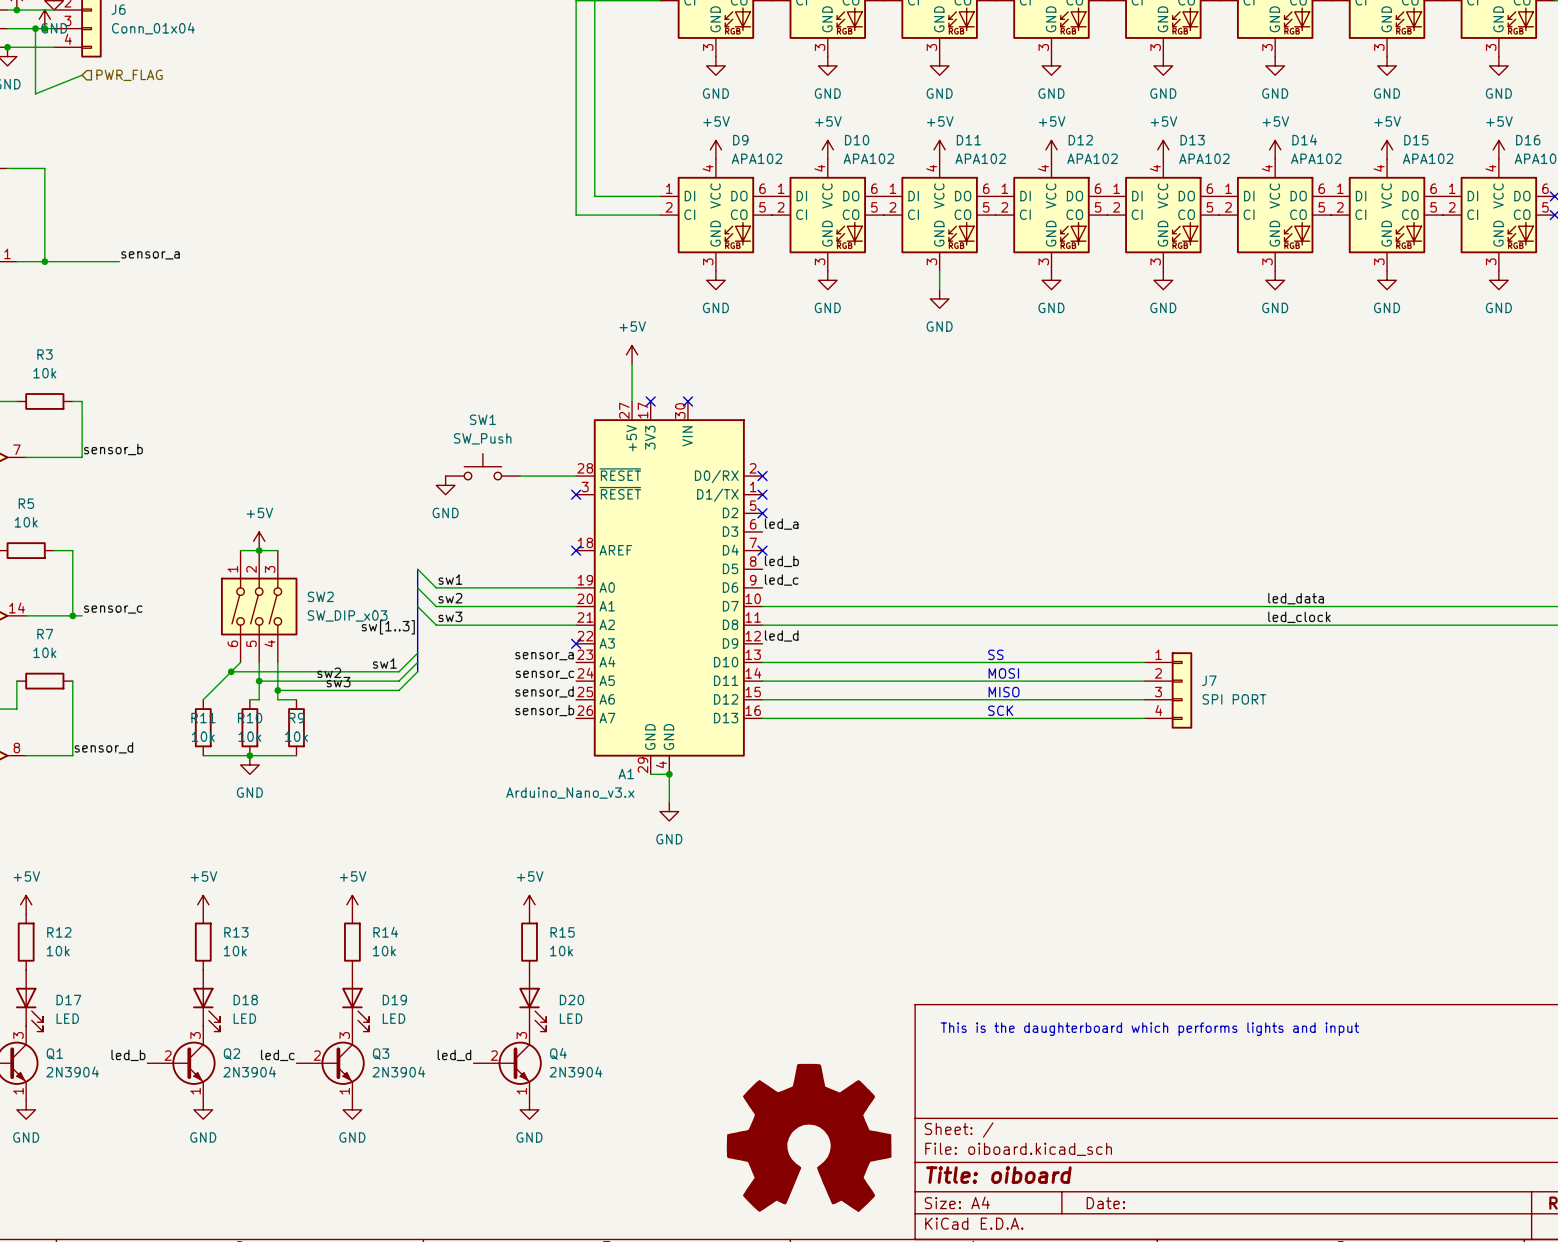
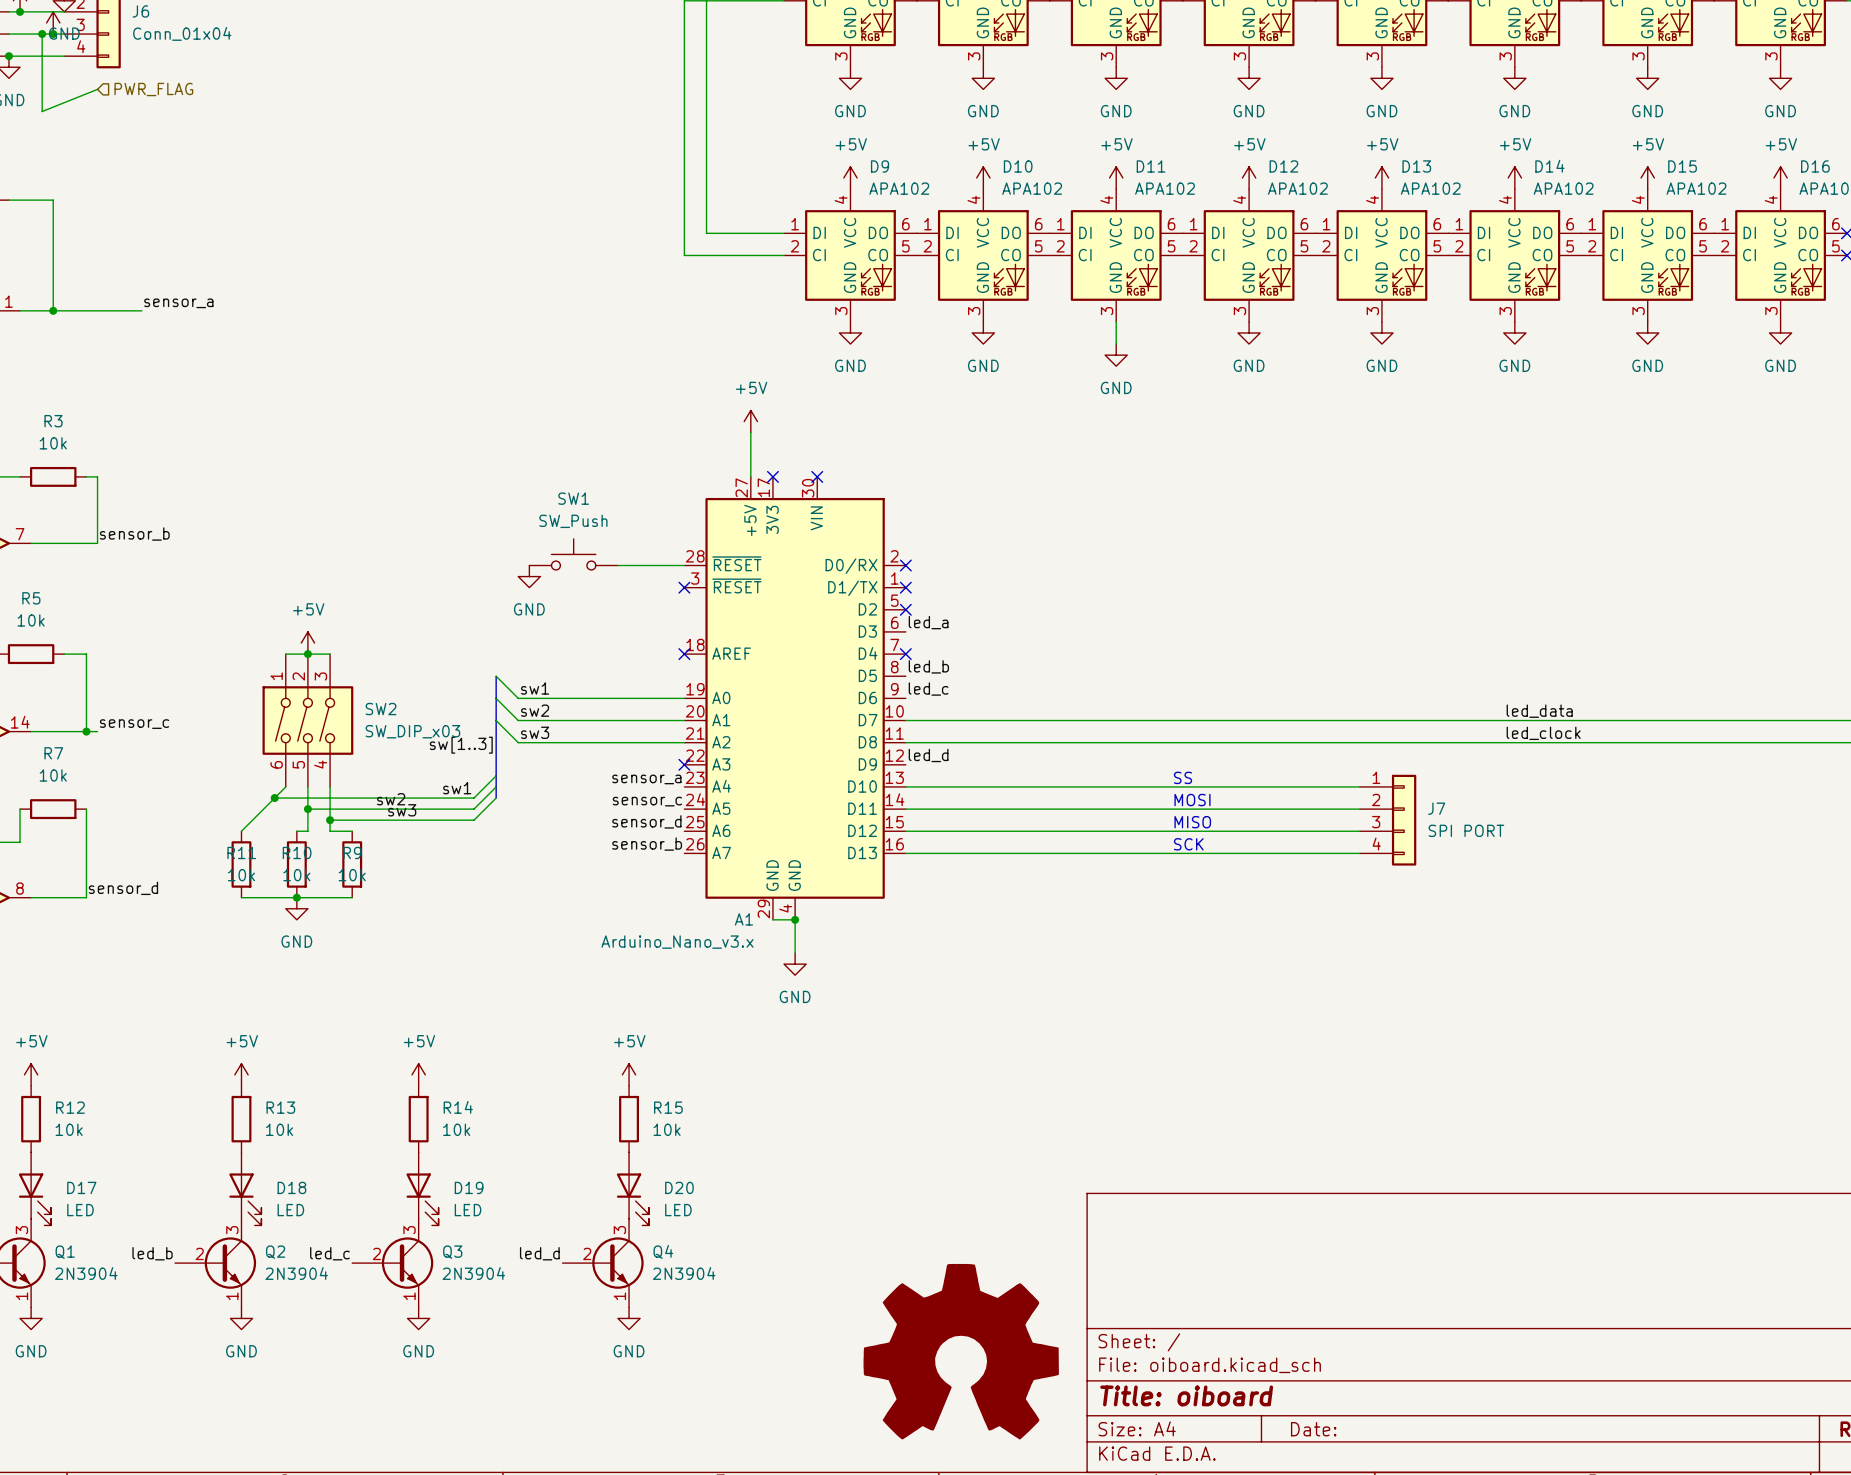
text: This is the daughterboard which performs lights and input (1149, 1029) -> none

